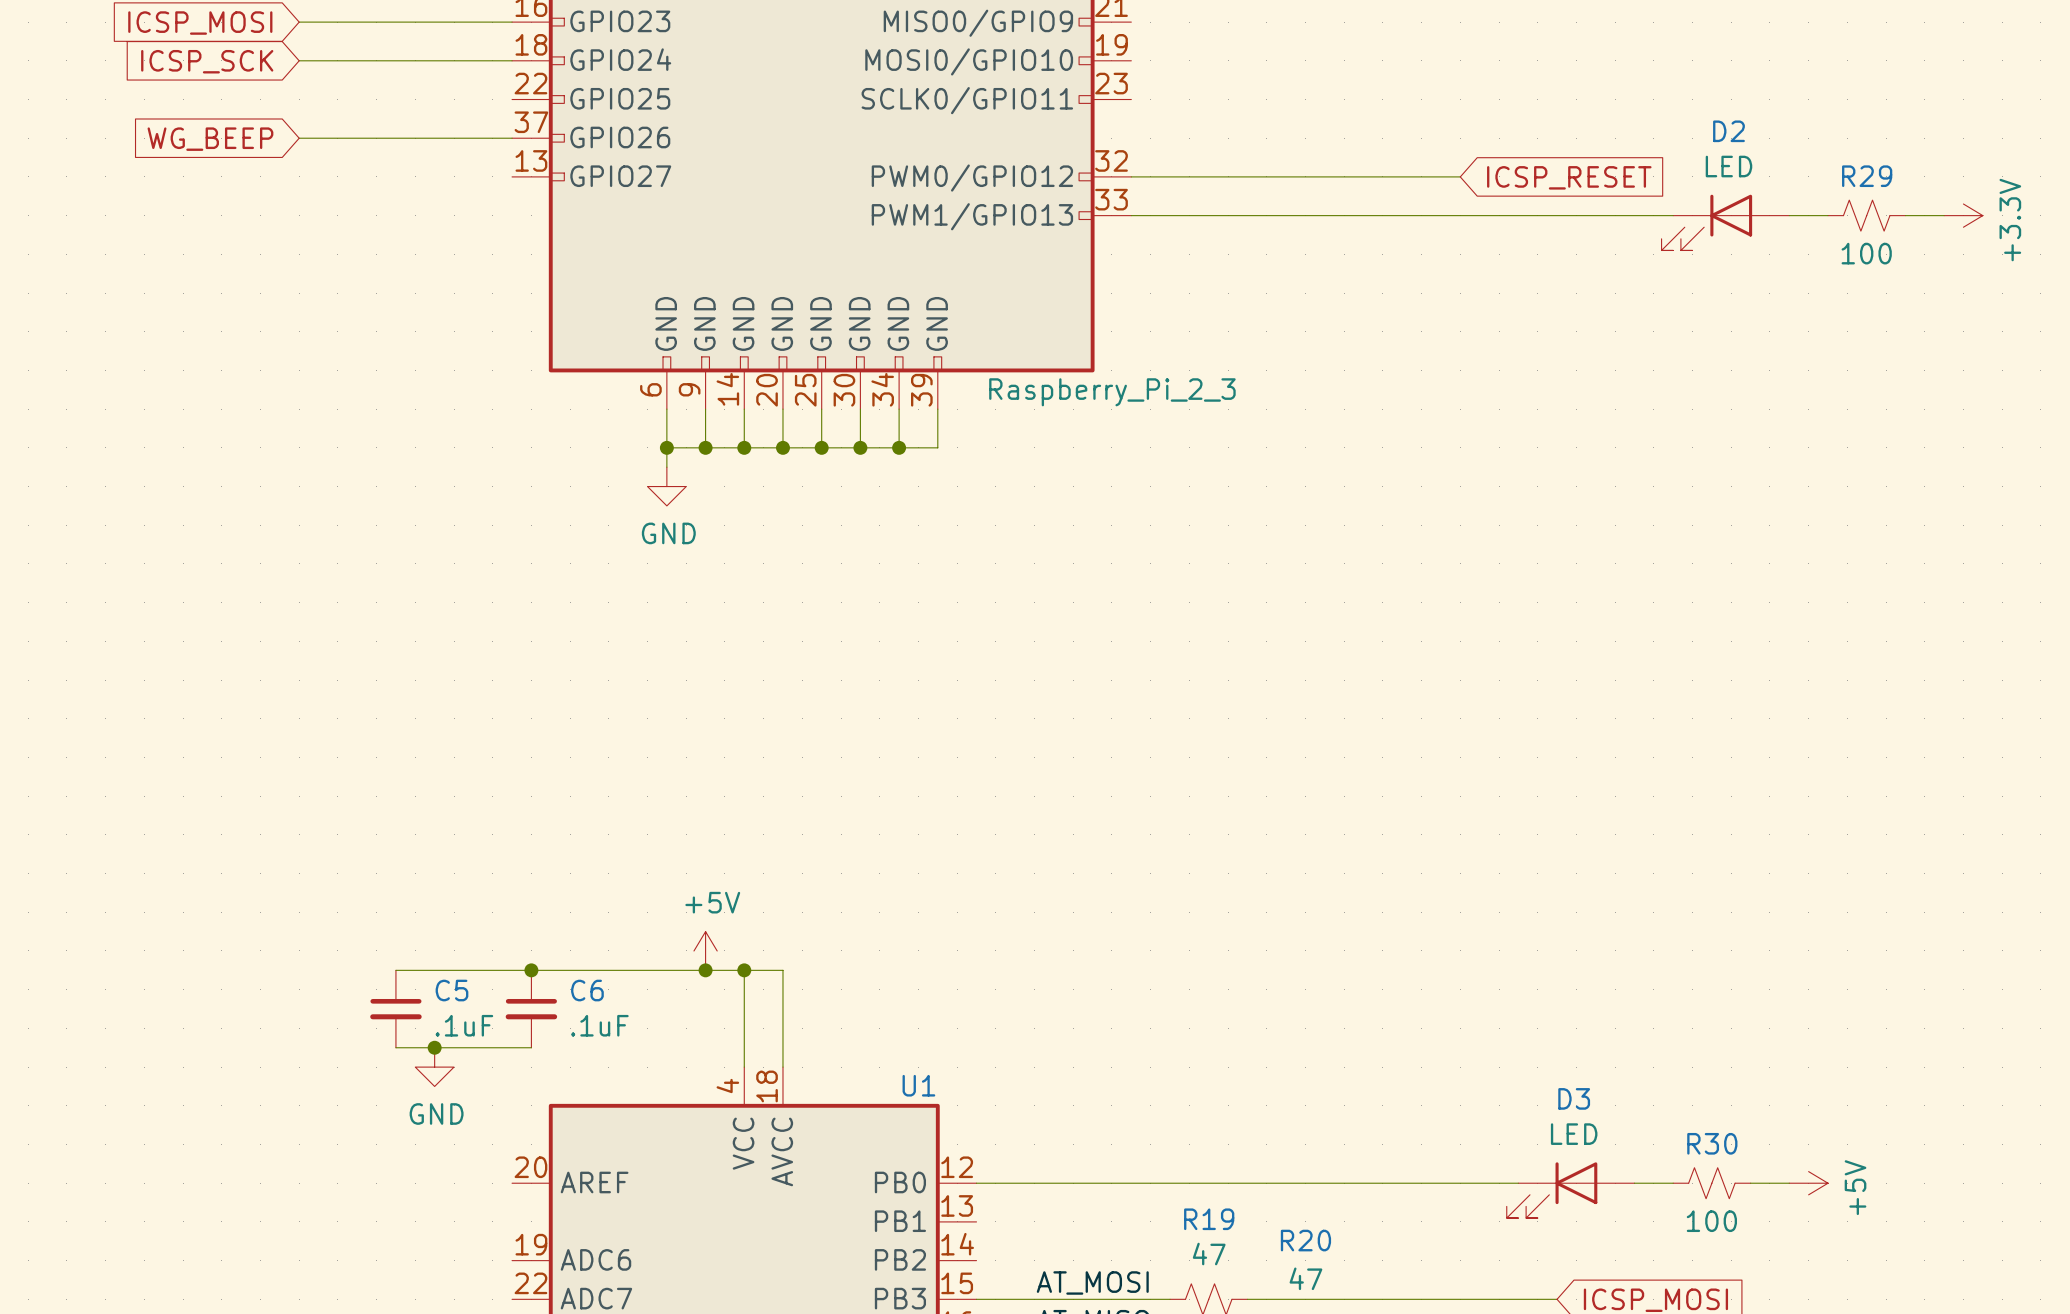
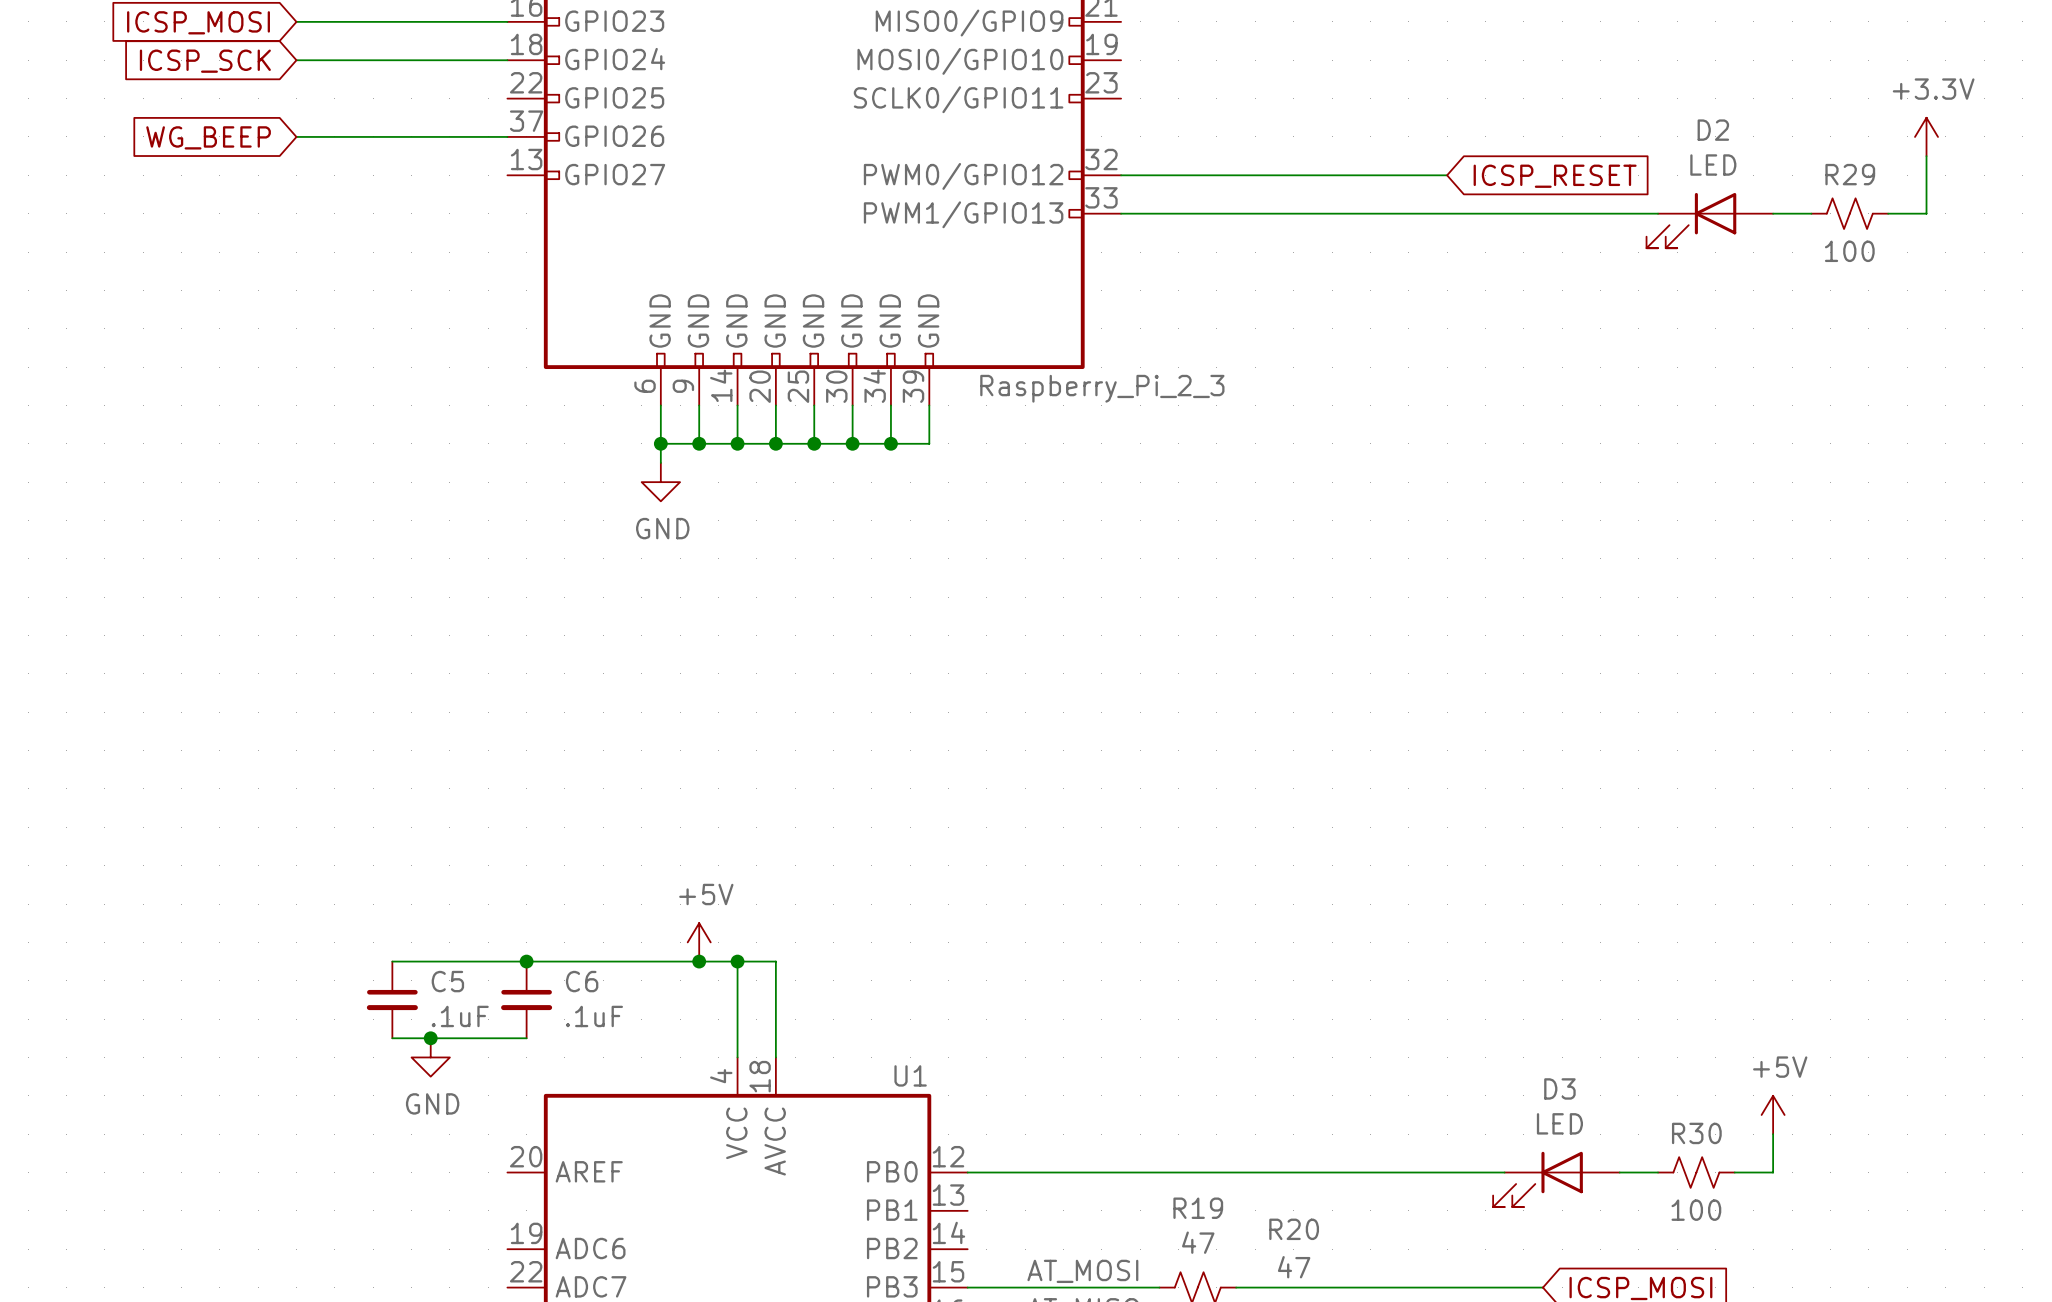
wire: none -> (1926, 156) (1926, 213)
power symbol rotation: 0° (1963, 215) -> 90° counterclockwise (1926, 136)
power symbol position: +3.3V (1963, 215) -> +3.3V (1926, 136)
wire: none -> (1773, 1134) (1773, 1172)
power symbol rotation: 0° (1808, 1183) -> 90° counterclockwise (1773, 1114)
power symbol position: +5V (1808, 1183) -> +5V (1773, 1114)

